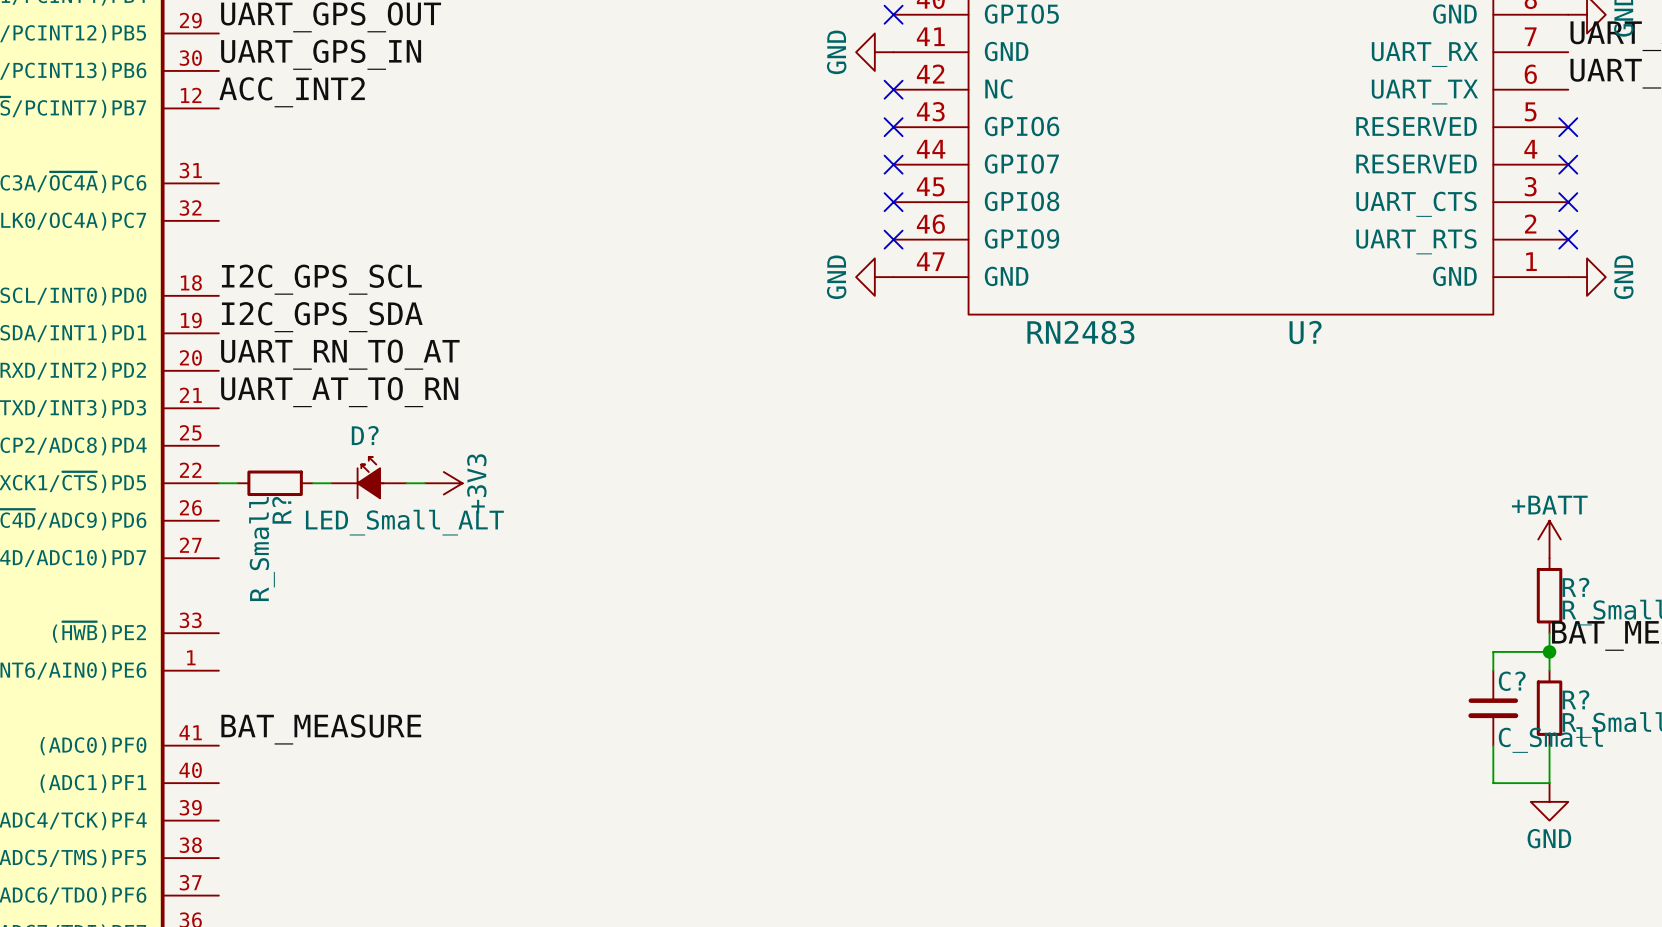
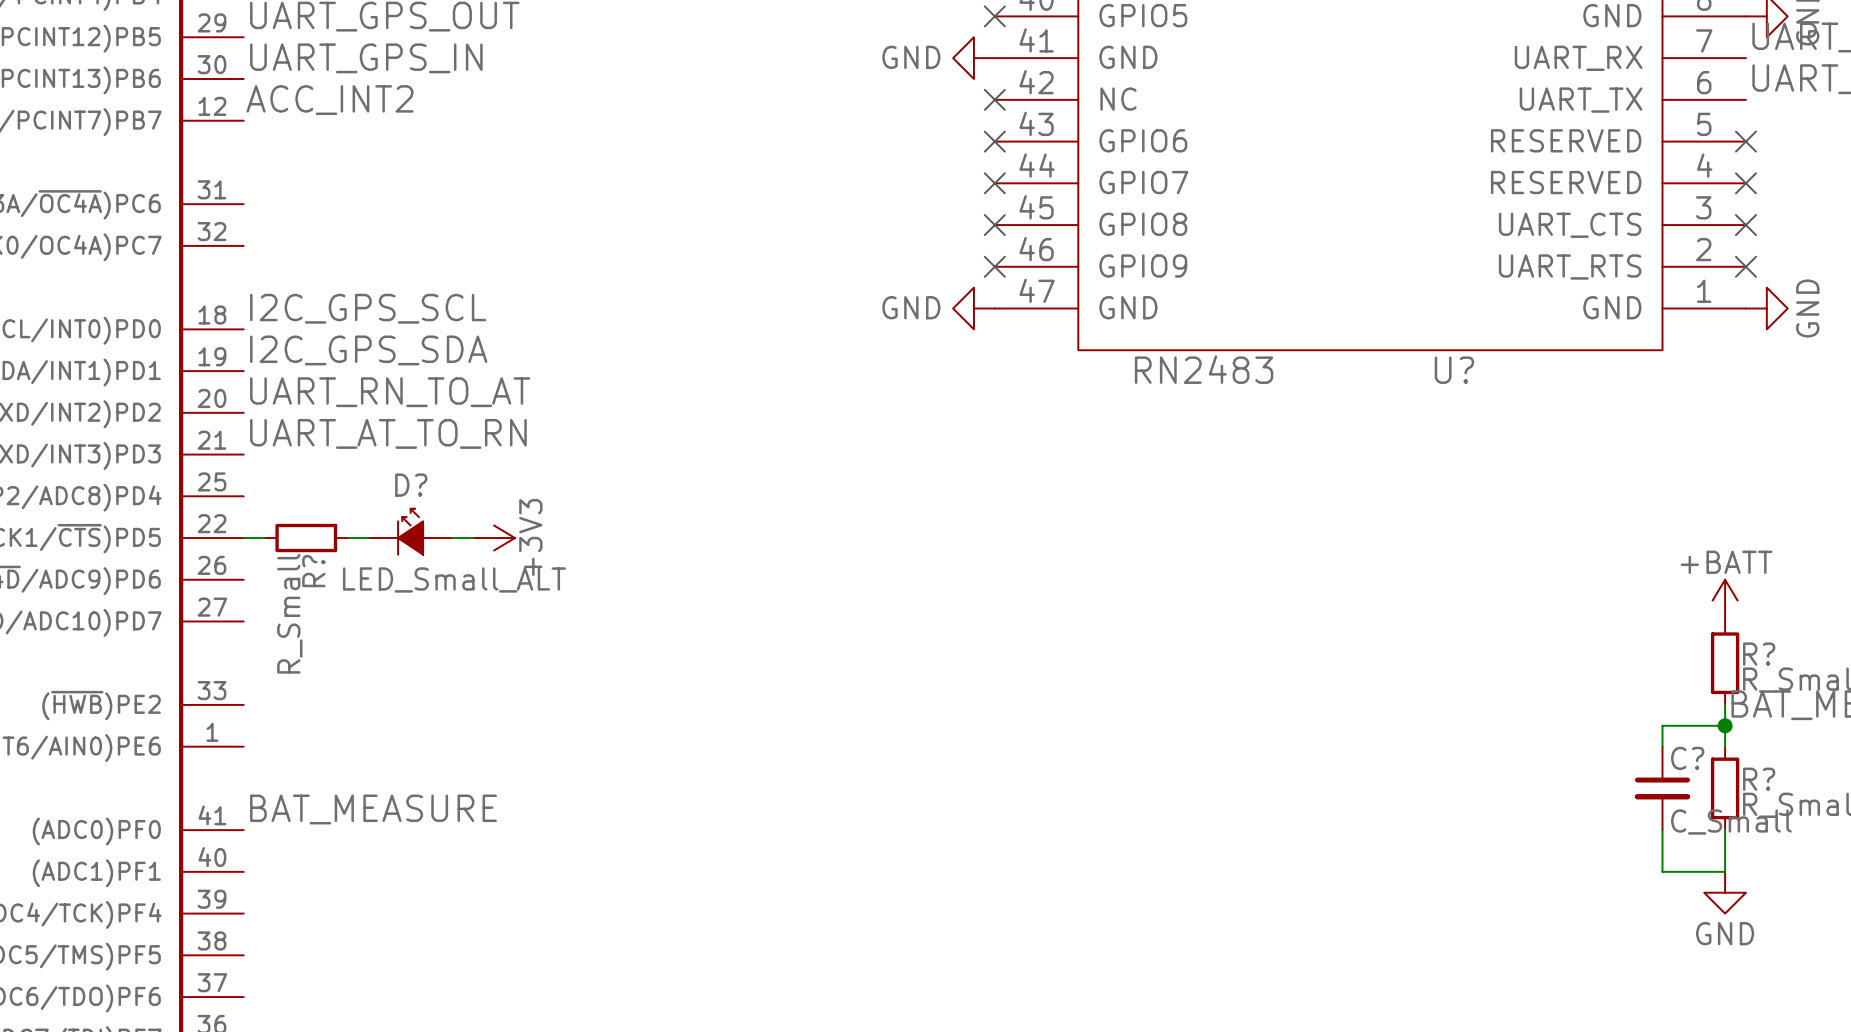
power symbol text rotation: 0° (836, 52) -> 90° clockwise (911, 57)
power symbol text rotation: 0° (836, 277) -> 90° clockwise (911, 307)

